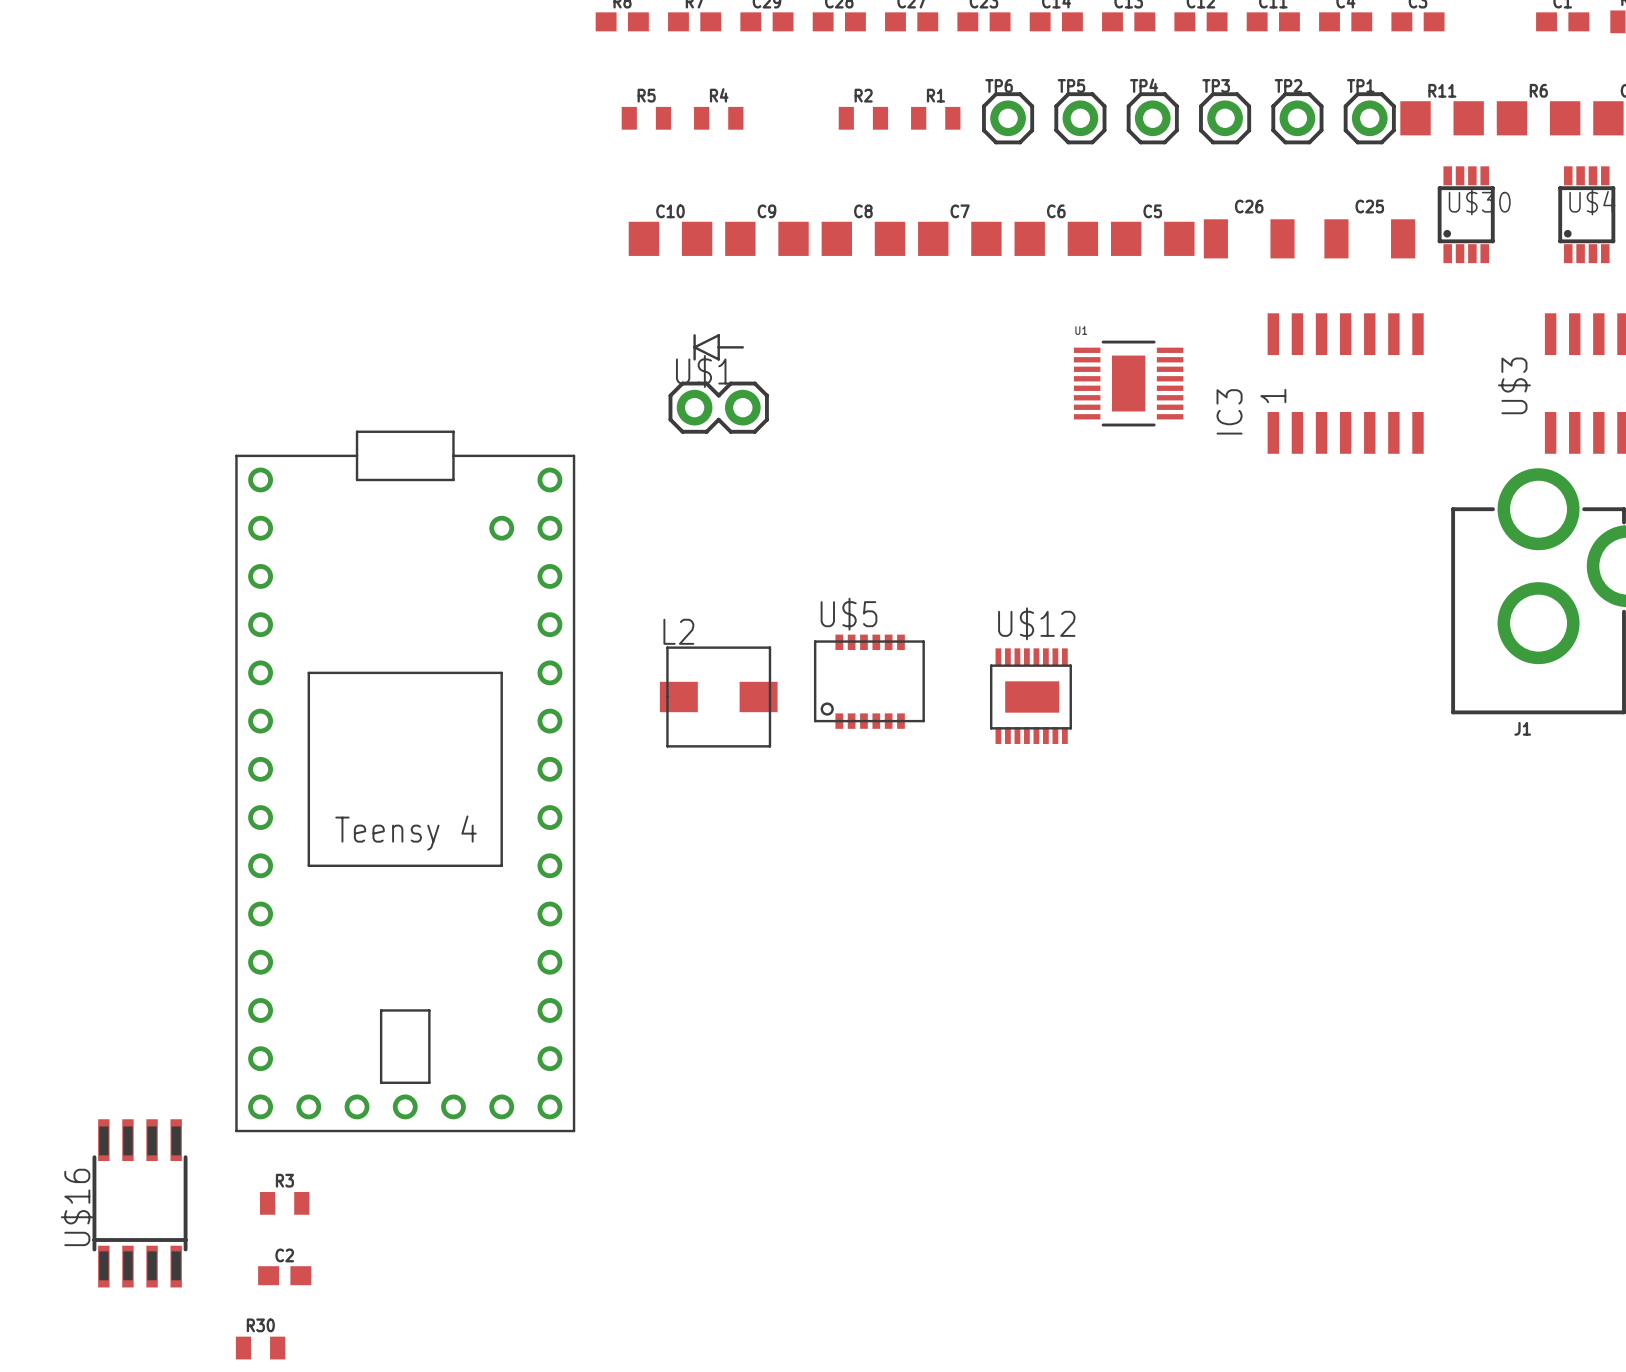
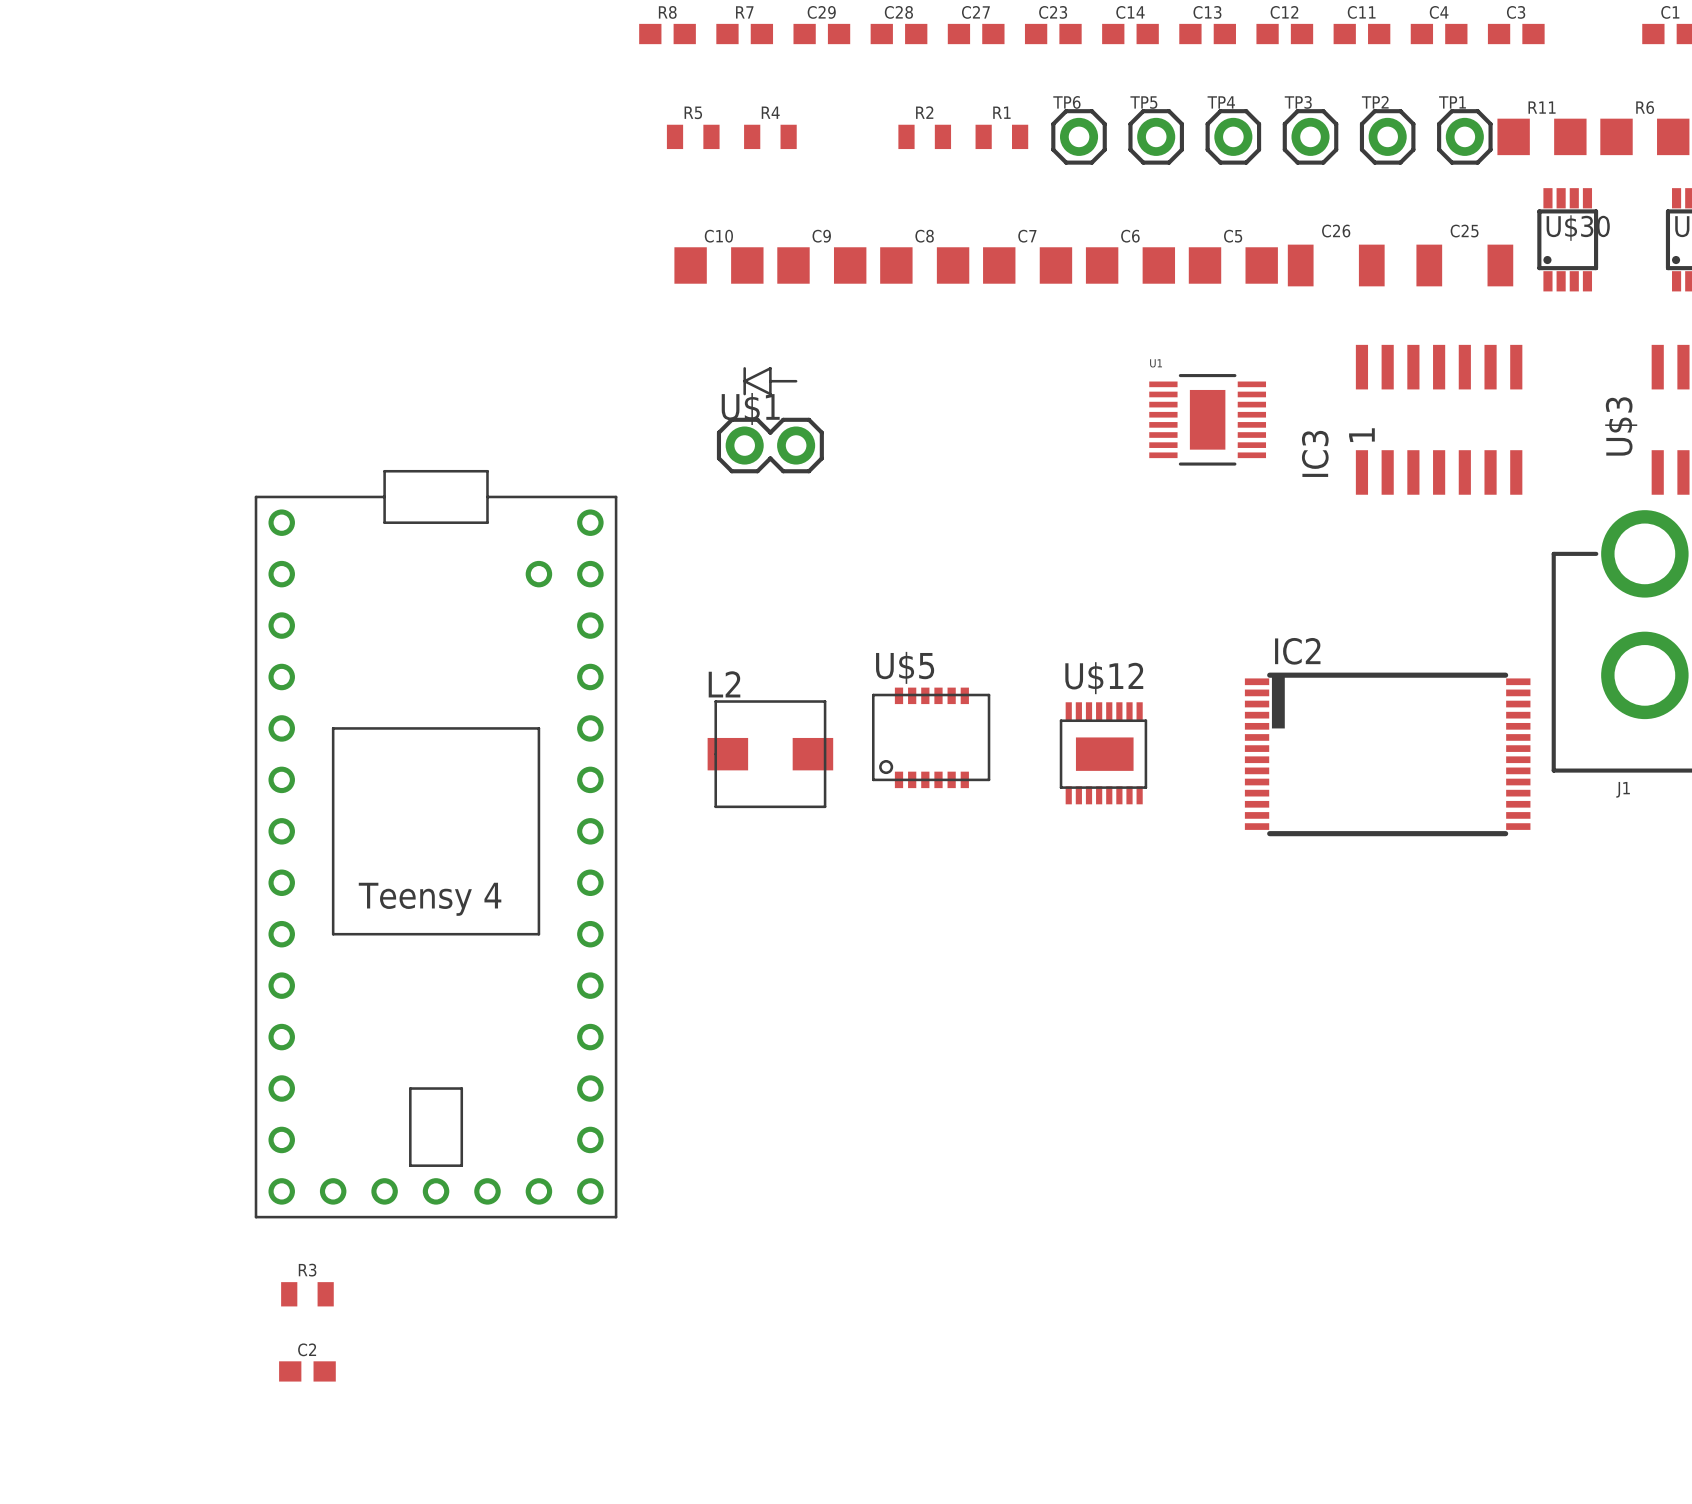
IC2: none -> (1387, 754)
U$16: (140, 1203) -> none
R30: (260, 1348) -> none

